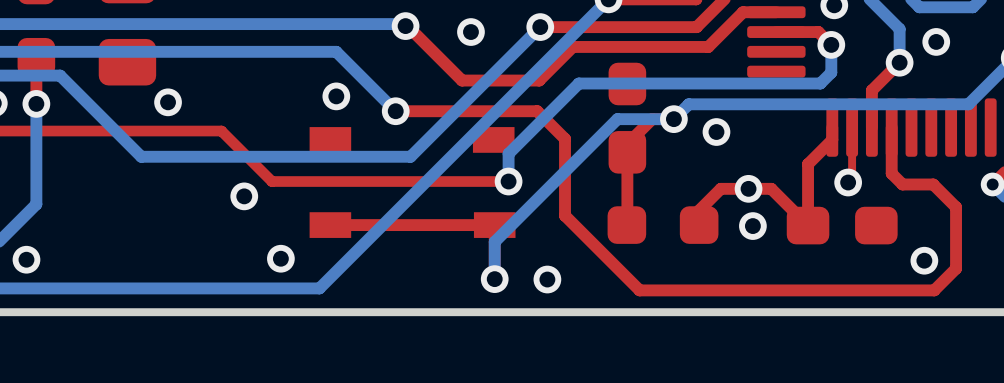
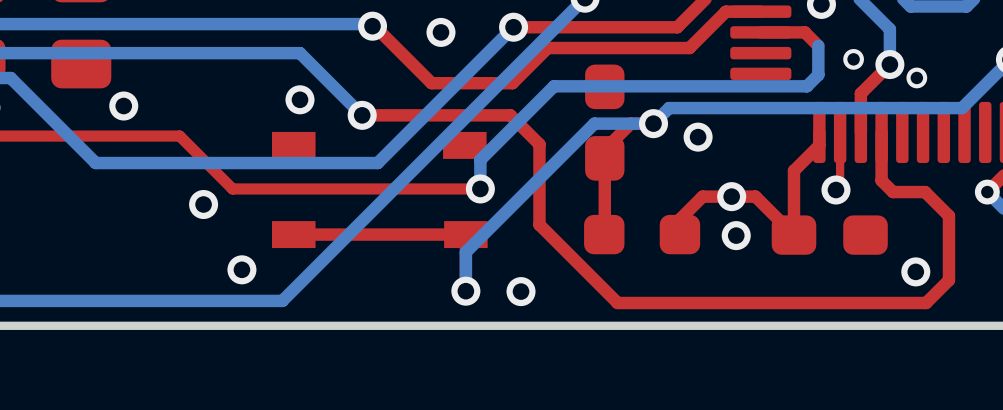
via: (936, 41) -> none
via: (831, 44) -> none
via: none -> (853, 59)
via: none -> (916, 77)

